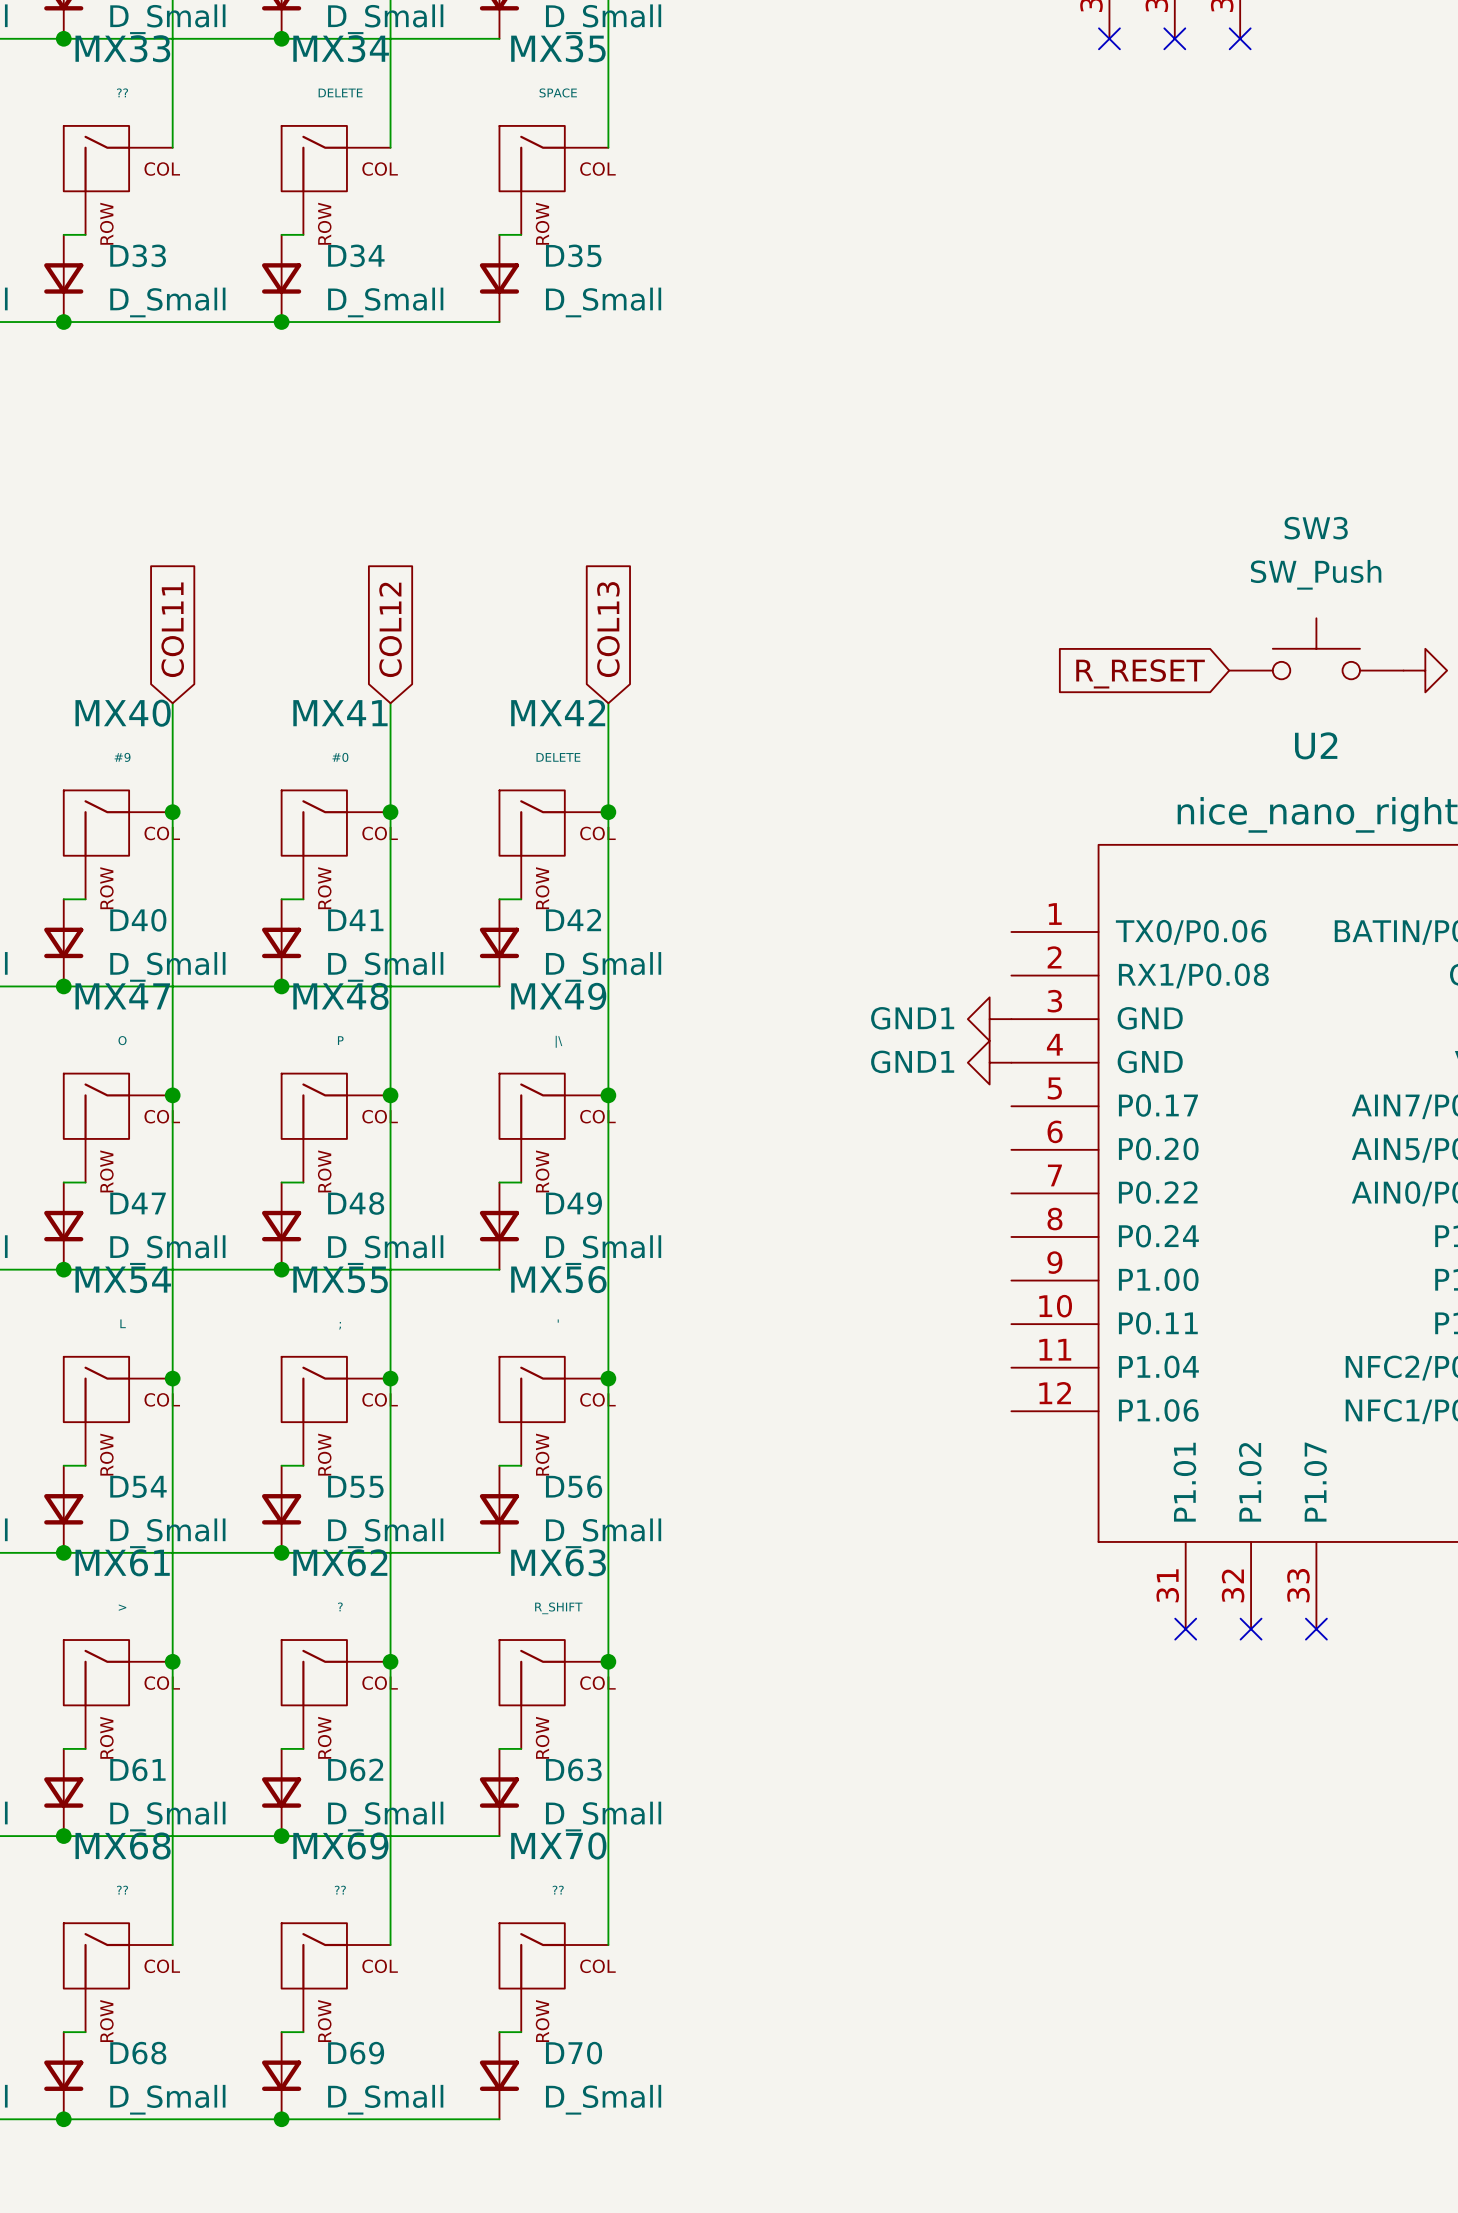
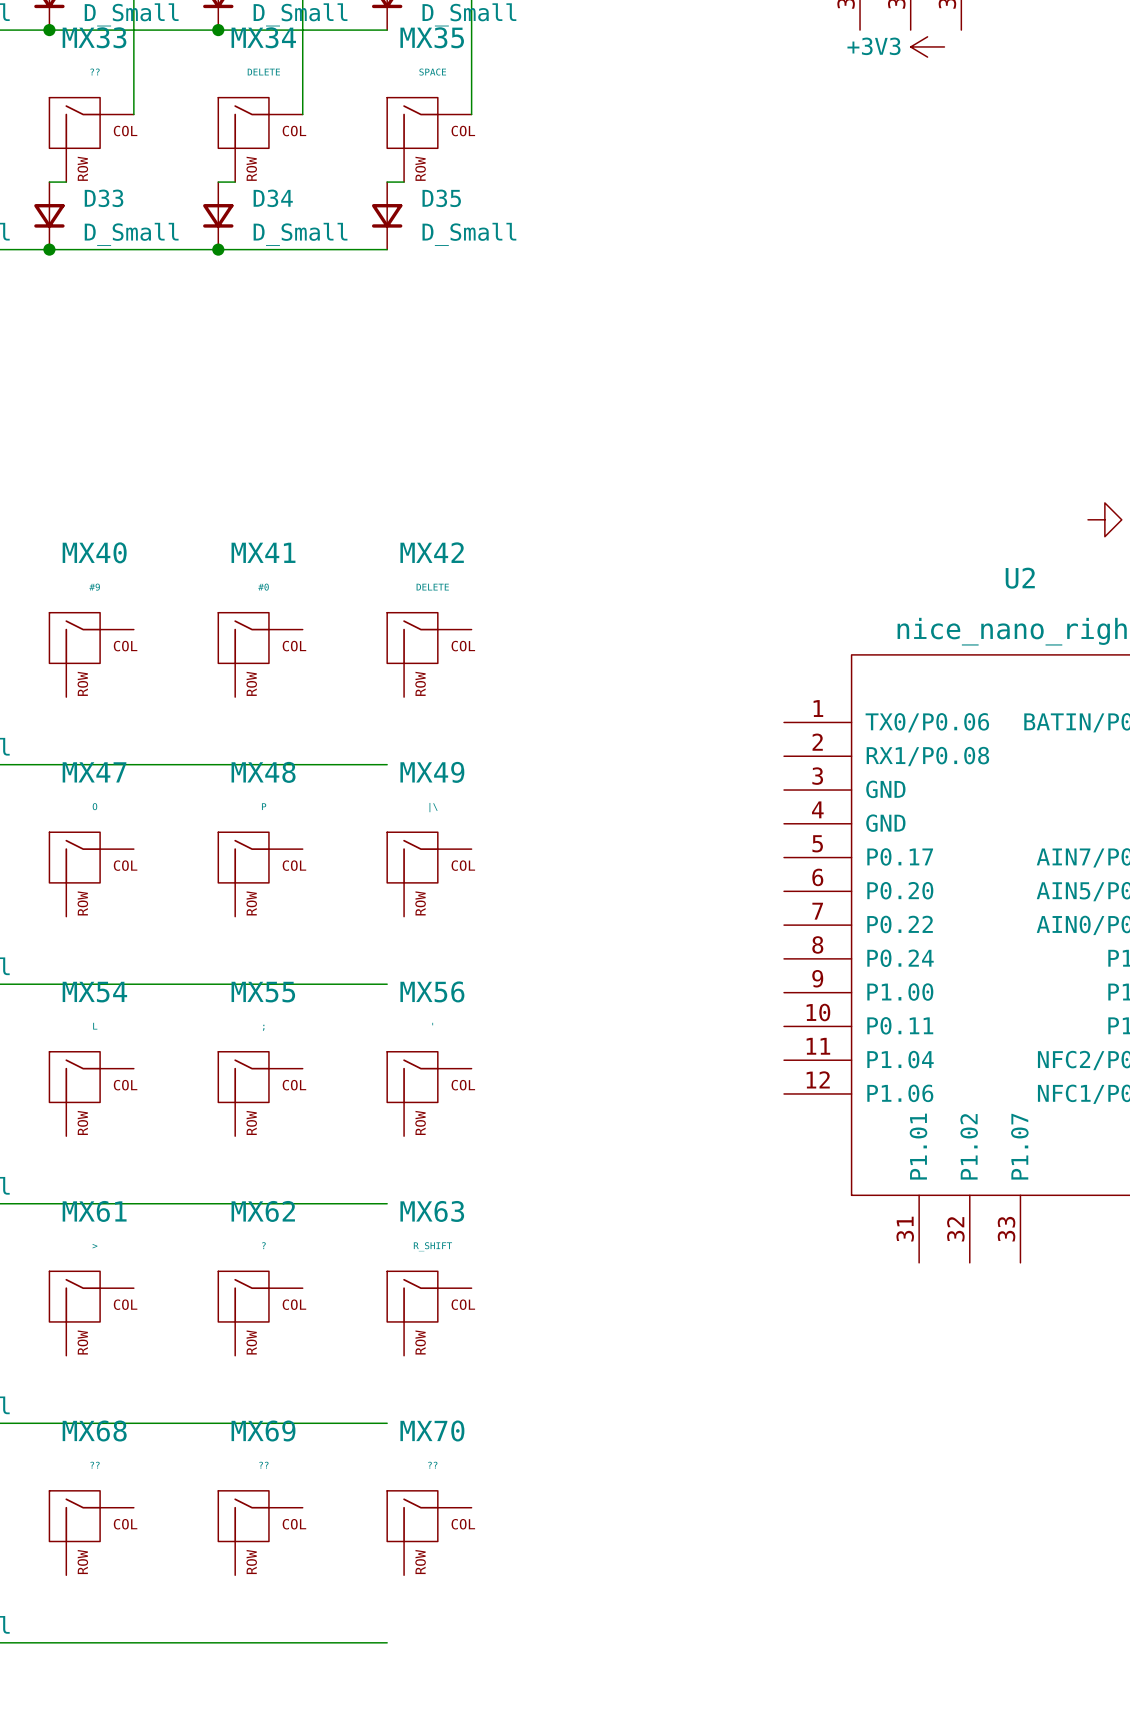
no-connect mark: (1109, 38) -> none
no-connect mark: (1174, 38) -> none
no-connect mark: (1240, 38) -> none
power symbol: none -> +3V3 (927, 46)
global label: COL11 (172, 629) -> none
global label: COL12 (390, 629) -> none
global label: COL13 (608, 629) -> none
SW3: SW_Push (1316, 648) -> none
global label: R_RESET (1140, 673) -> none
wire: (172, 703) (172, 1945) -> none
wire: (390, 703) (390, 1945) -> none
wire: (608, 703) (608, 1945) -> none
junction: (172, 812) -> none
junction: (390, 812) -> none
junction: (608, 812) -> none
wire: (63, 899) (85, 899) -> none
wire: (281, 899) (303, 899) -> none
wire: (499, 899) (521, 899) -> none
D40: D_Small (63, 942) -> none
D41: D_Small (281, 942) -> none
D42: D_Small (499, 942) -> none
junction: (63, 986) -> none
junction: (281, 986) -> none
power symbol: GND1 (989, 1019) -> none
power symbol: GND1 (989, 1062) -> none
junction: (172, 1095) -> none
junction: (390, 1095) -> none
junction: (608, 1095) -> none
wire: (63, 1182) (85, 1182) -> none
wire: (281, 1182) (303, 1182) -> none
wire: (499, 1182) (521, 1182) -> none
D47: D_Small (63, 1226) -> none
D48: D_Small (281, 1226) -> none
D49: D_Small (499, 1226) -> none
junction: (63, 1269) -> none
junction: (281, 1269) -> none
junction: (172, 1378) -> none
junction: (390, 1378) -> none
junction: (608, 1378) -> none
wire: (63, 1465) (85, 1465) -> none
wire: (281, 1465) (303, 1465) -> none
wire: (499, 1465) (521, 1465) -> none
D54: D_Small (63, 1509) -> none
D55: D_Small (281, 1509) -> none
D56: D_Small (499, 1509) -> none
junction: (63, 1552) -> none
junction: (281, 1552) -> none
no-connect mark: (1185, 1629) -> none
no-connect mark: (1251, 1629) -> none
no-connect mark: (1316, 1629) -> none
junction: (172, 1661) -> none
junction: (390, 1661) -> none
junction: (608, 1661) -> none
wire: (63, 1748) (85, 1748) -> none
wire: (281, 1748) (303, 1748) -> none
wire: (499, 1748) (521, 1748) -> none
D61: D_Small (63, 1792) -> none
D62: D_Small (281, 1792) -> none
D63: D_Small (499, 1792) -> none
junction: (63, 1836) -> none
junction: (281, 1836) -> none
wire: (63, 2032) (85, 2032) -> none
wire: (281, 2032) (303, 2032) -> none
wire: (499, 2032) (521, 2032) -> none
D68: D_Small (63, 2075) -> none
D69: D_Small (281, 2075) -> none
D70: D_Small (499, 2075) -> none
junction: (63, 2119) -> none
junction: (281, 2119) -> none

